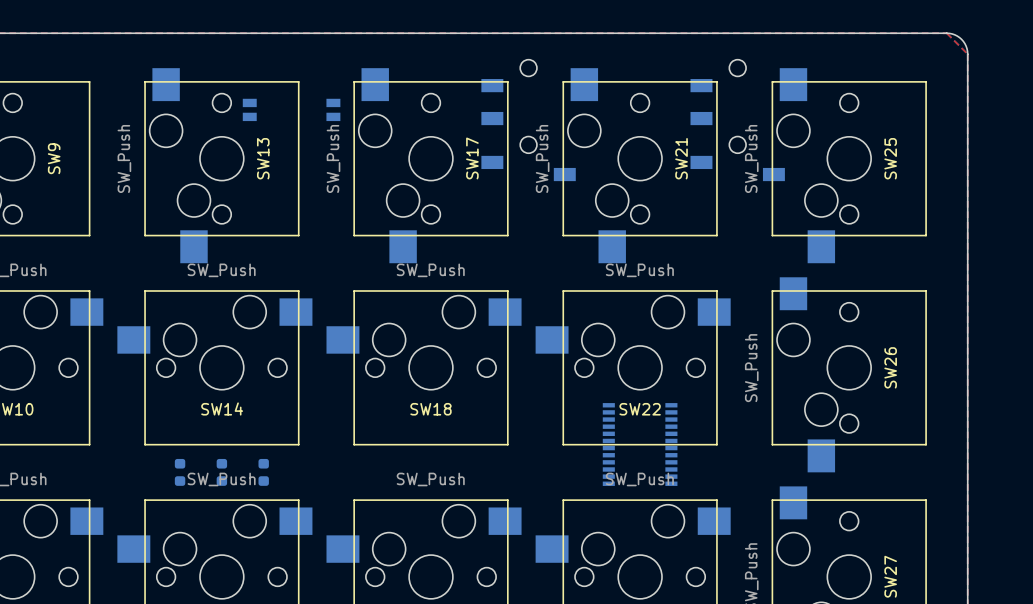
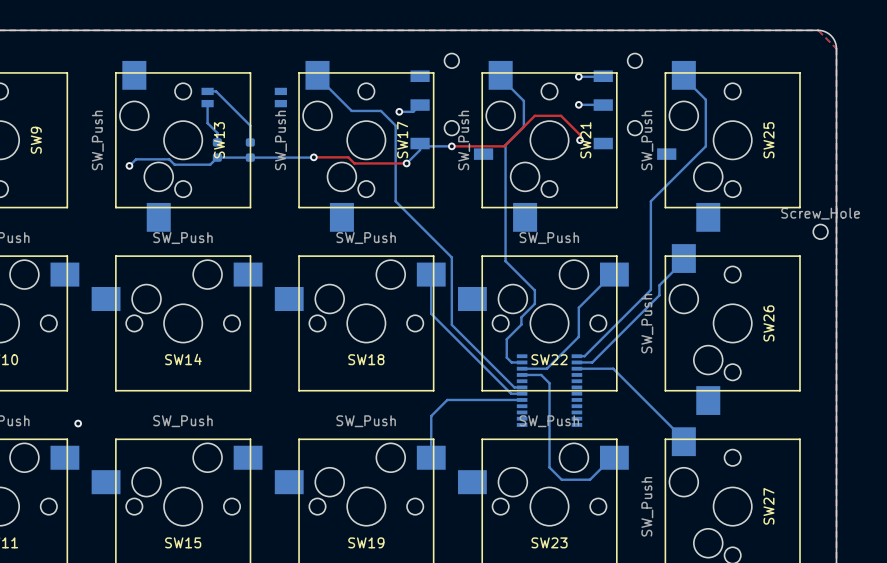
bottom track: none -> (500, 75) (500, 77) (523, 100) (523, 126) (505, 145) (505, 261) (534, 290) (534, 303) (521, 317) (521, 324) (506, 339) (506, 357) (511, 362) (522, 362)
bottom track: none -> (683, 75) (683, 77) (705, 99) (705, 146) (650, 201) (650, 289) (584, 356) (576, 356)
bottom track: none -> (603, 76) (578, 76)
bottom track: none -> (317, 76) (351, 110) (381, 110) (395, 125) (395, 201) (451, 257) (451, 324) (514, 387) (522, 387)
via: none -> (578, 76)
bottom track: none -> (207, 91) (216, 91) (250, 125) (250, 142)
bottom track: none -> (207, 103) (207, 123) (217, 132) (217, 142)
bottom track: none -> (420, 105) (413, 111) (399, 111)
bottom track: none -> (578, 104) (603, 105)
via: none -> (578, 104)
via: none -> (399, 111)
top track: none -> (580, 140) (580, 134) (561, 115) (534, 115) (504, 146) (451, 146)
via: none -> (580, 140)
bottom track: none -> (451, 146) (422, 146) (420, 143) (420, 150) (406, 163)
via: none -> (451, 146)
part: none -> (217, 150)
part: none -> (250, 150)
bottom track: none -> (313, 157) (217, 157) (210, 164) (174, 164) (169, 159) (136, 159) (129, 165)
top track: none -> (313, 157) (348, 157) (354, 163) (406, 163)
via: none -> (313, 157)
via: none -> (406, 163)
via: none -> (129, 165)
part: none -> Screw_Hole (820, 231)
bottom track: none -> (683, 258) (683, 260) (659, 285) (659, 295) (592, 362) (576, 362)
bottom track: none -> (431, 274) (431, 313) (511, 393) (522, 393)
bottom track: none -> (614, 274) (612, 274) (578, 307) (578, 336) (546, 368) (522, 368)
bottom track: none -> (576, 368) (613, 368) (683, 439) (683, 441)
bottom track: none -> (522, 374) (541, 374) (549, 383) (549, 467) (561, 479) (590, 479) (612, 457) (614, 457)
bottom track: none -> (522, 399) (447, 399) (431, 416) (431, 457)
part: (180, 472) -> none
part: (221, 472) -> none
part: (263, 472) -> none
via: none -> (78, 423)

